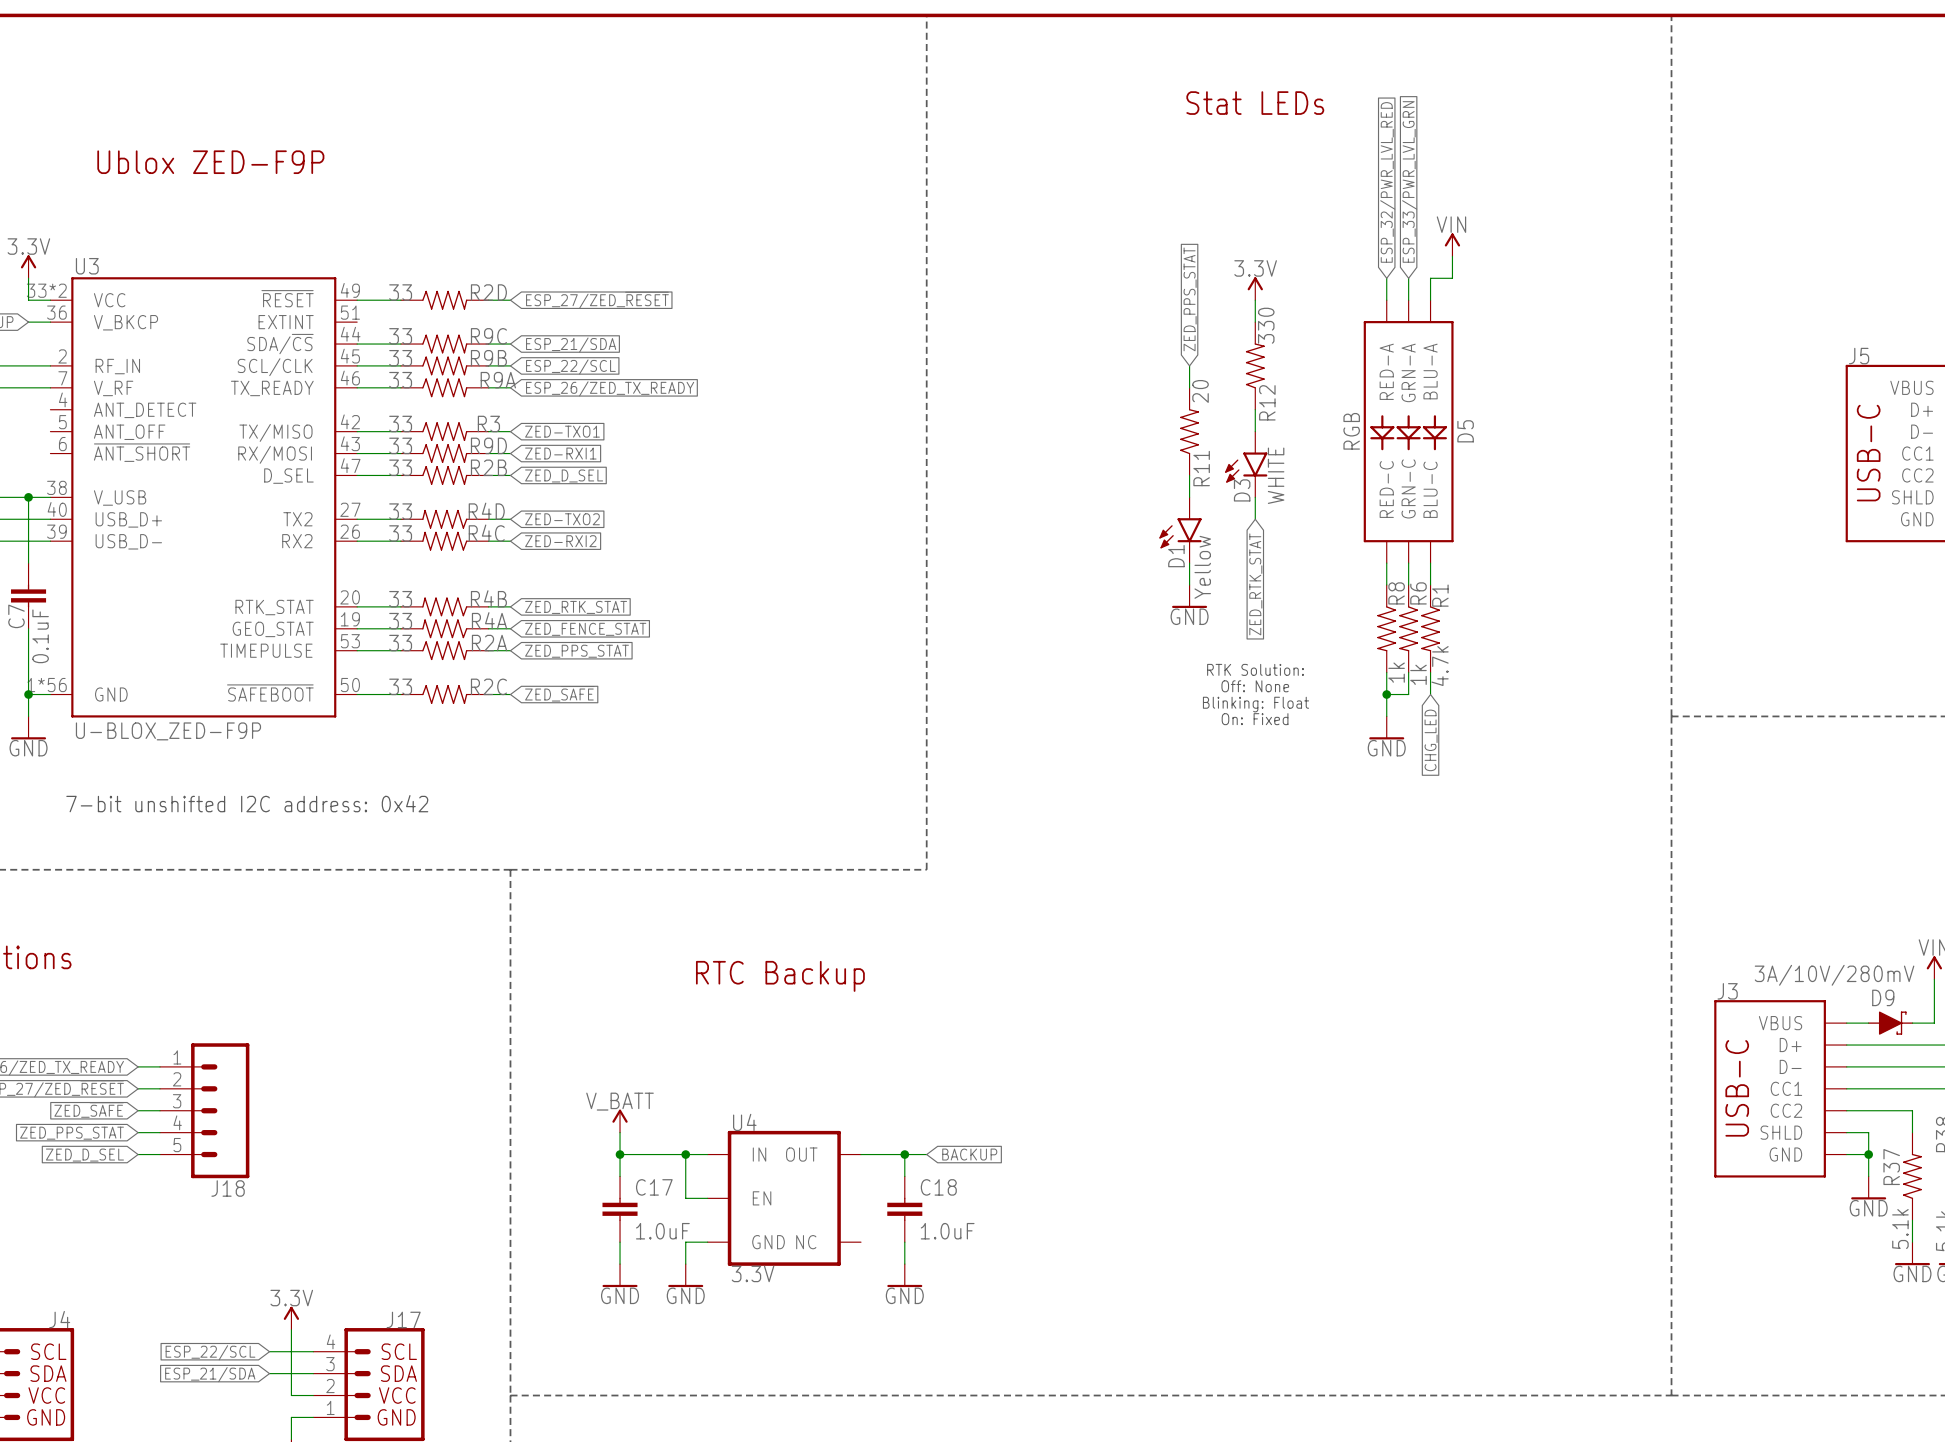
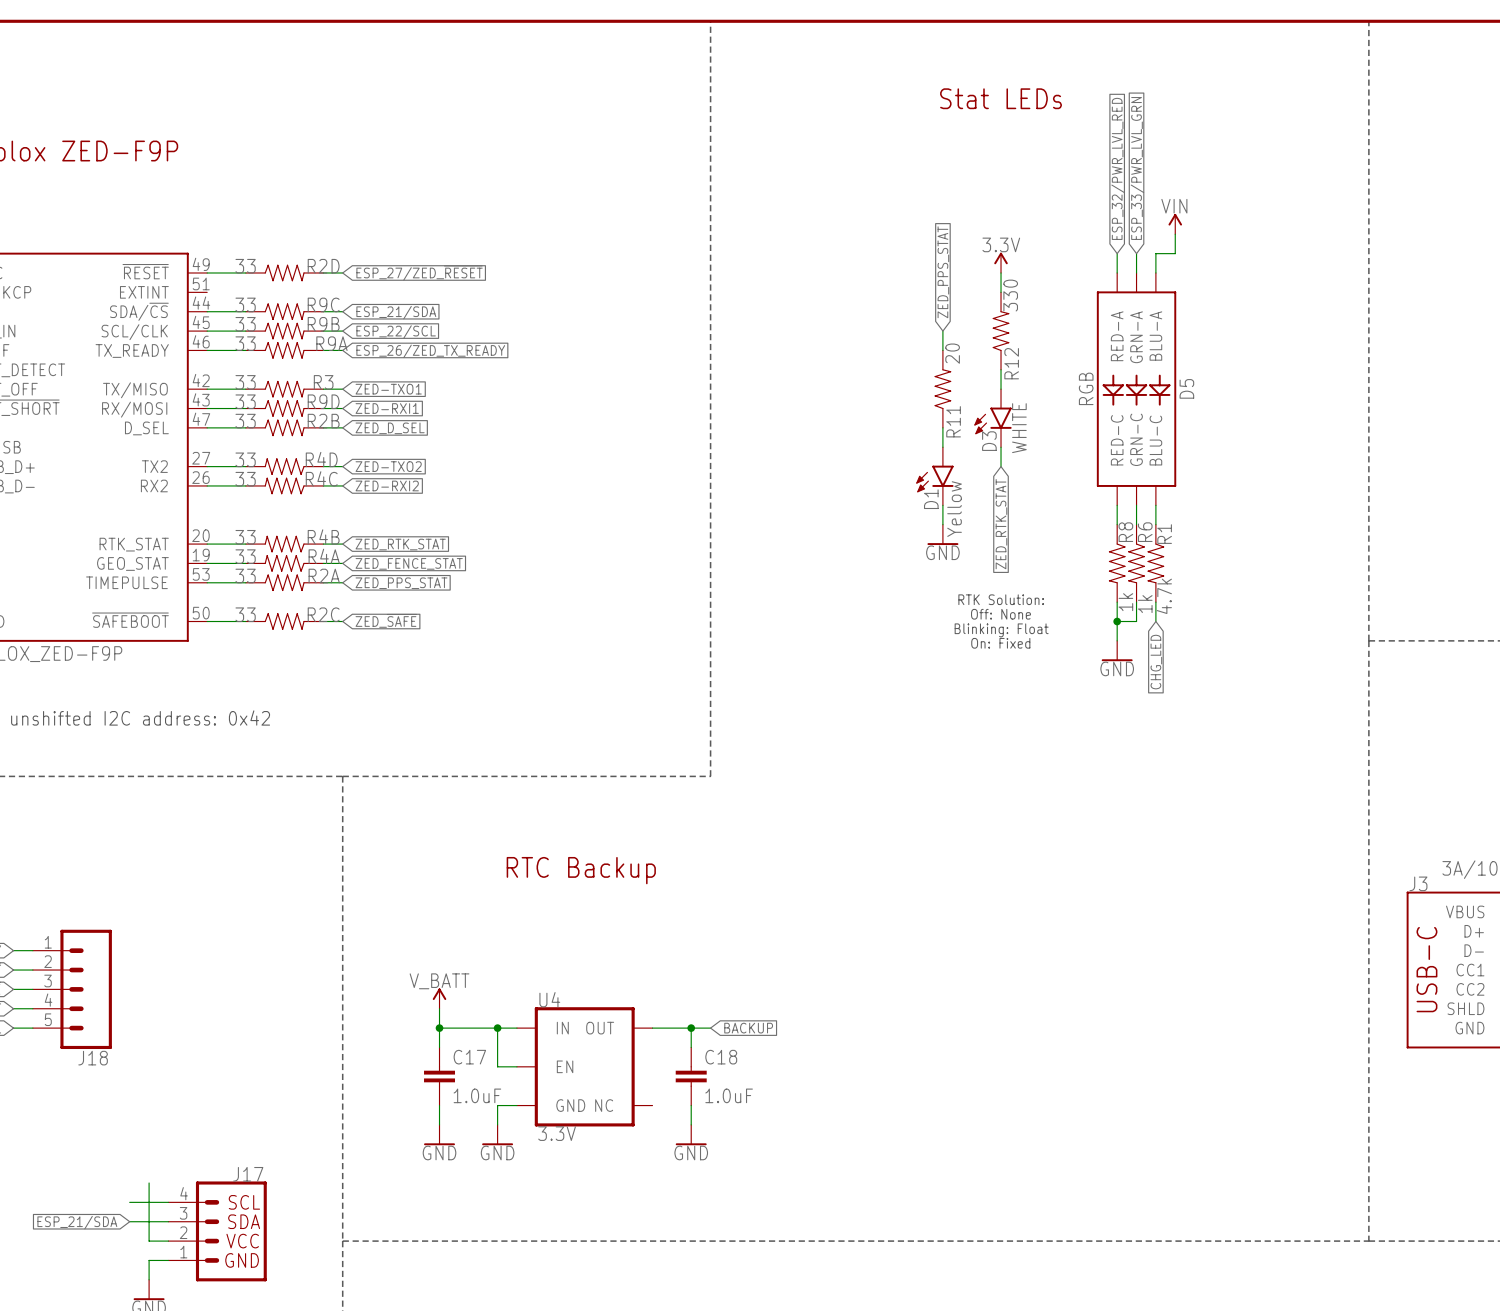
power symbol: 3.3V (291, 1318) -> none
global label: ESP_22/SCL (210, 1352) -> none

